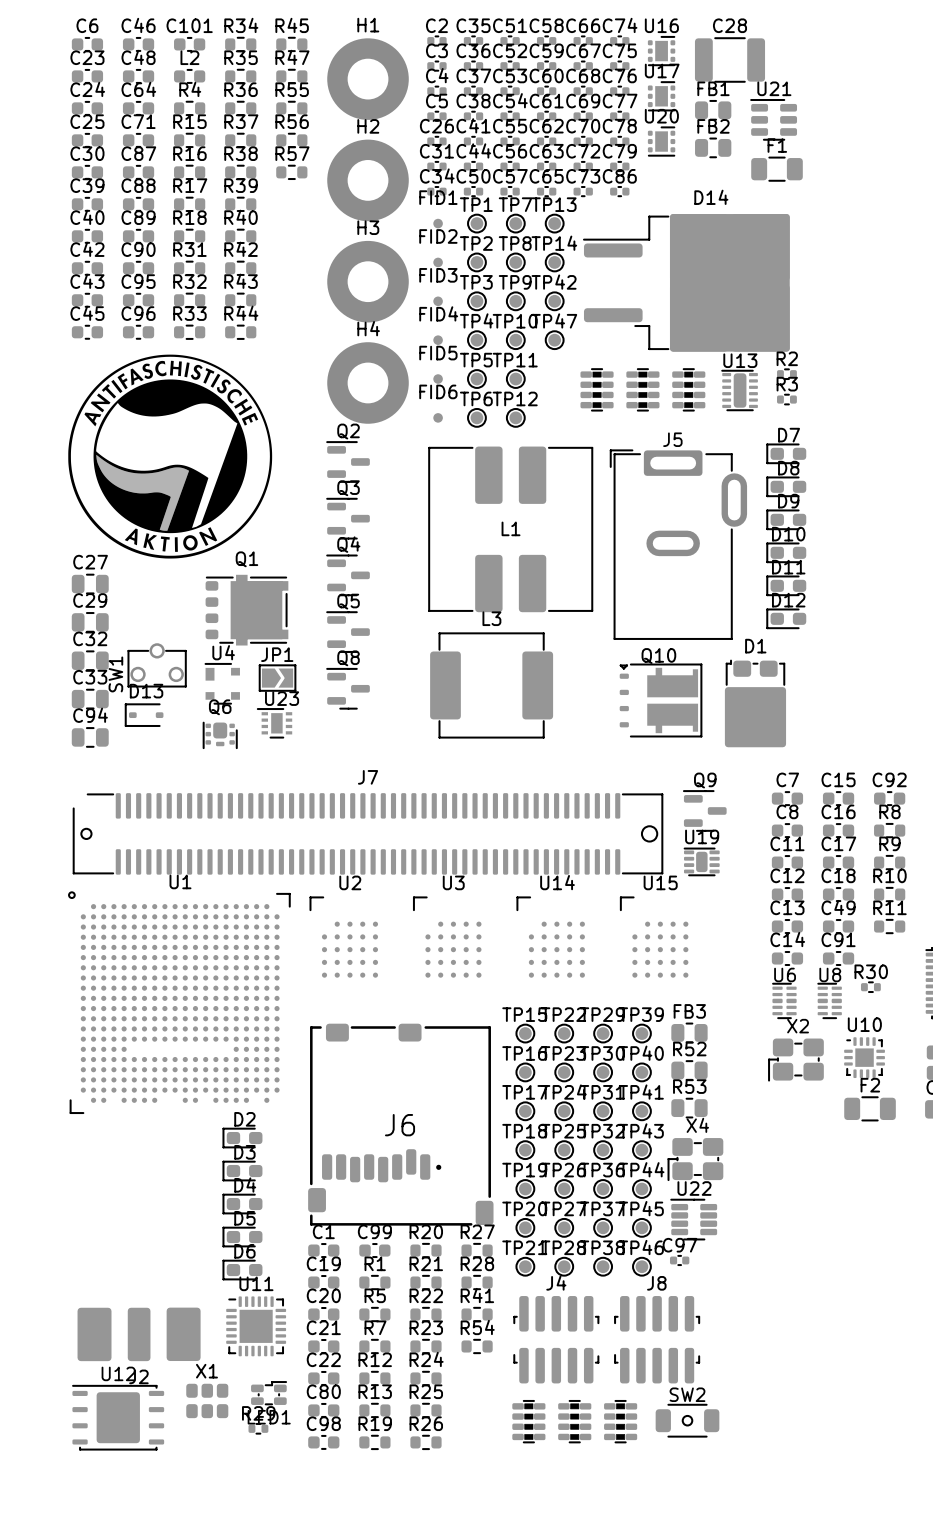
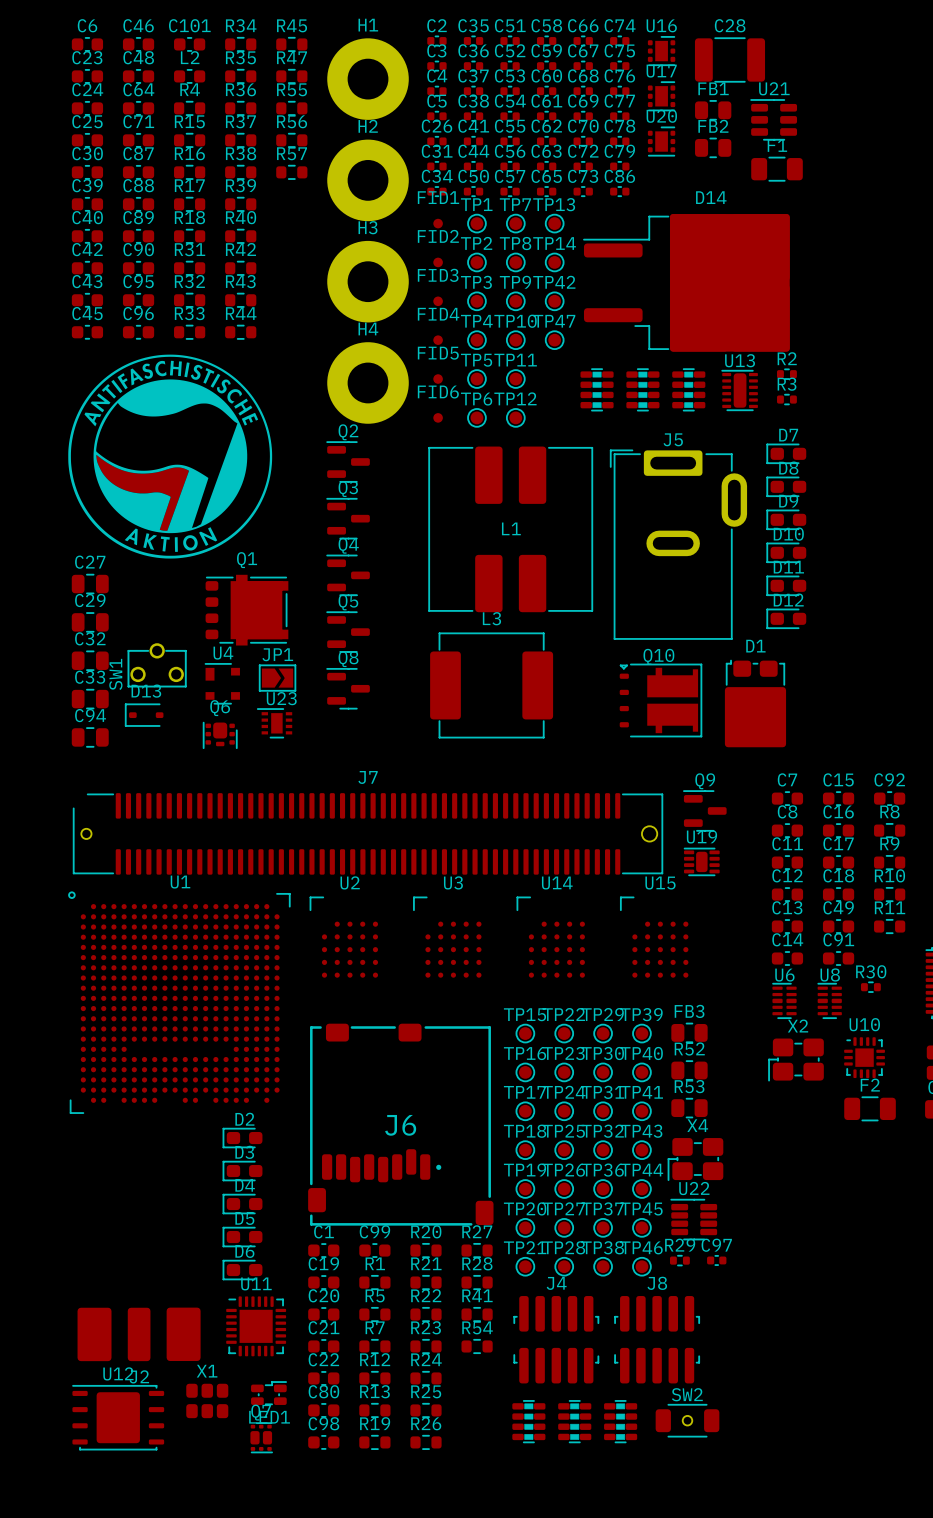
C97 position: (679, 1260) -> (716, 1260)
R29 position: (258, 1428) -> (679, 1260)
Q7: none -> (261, 1437)

